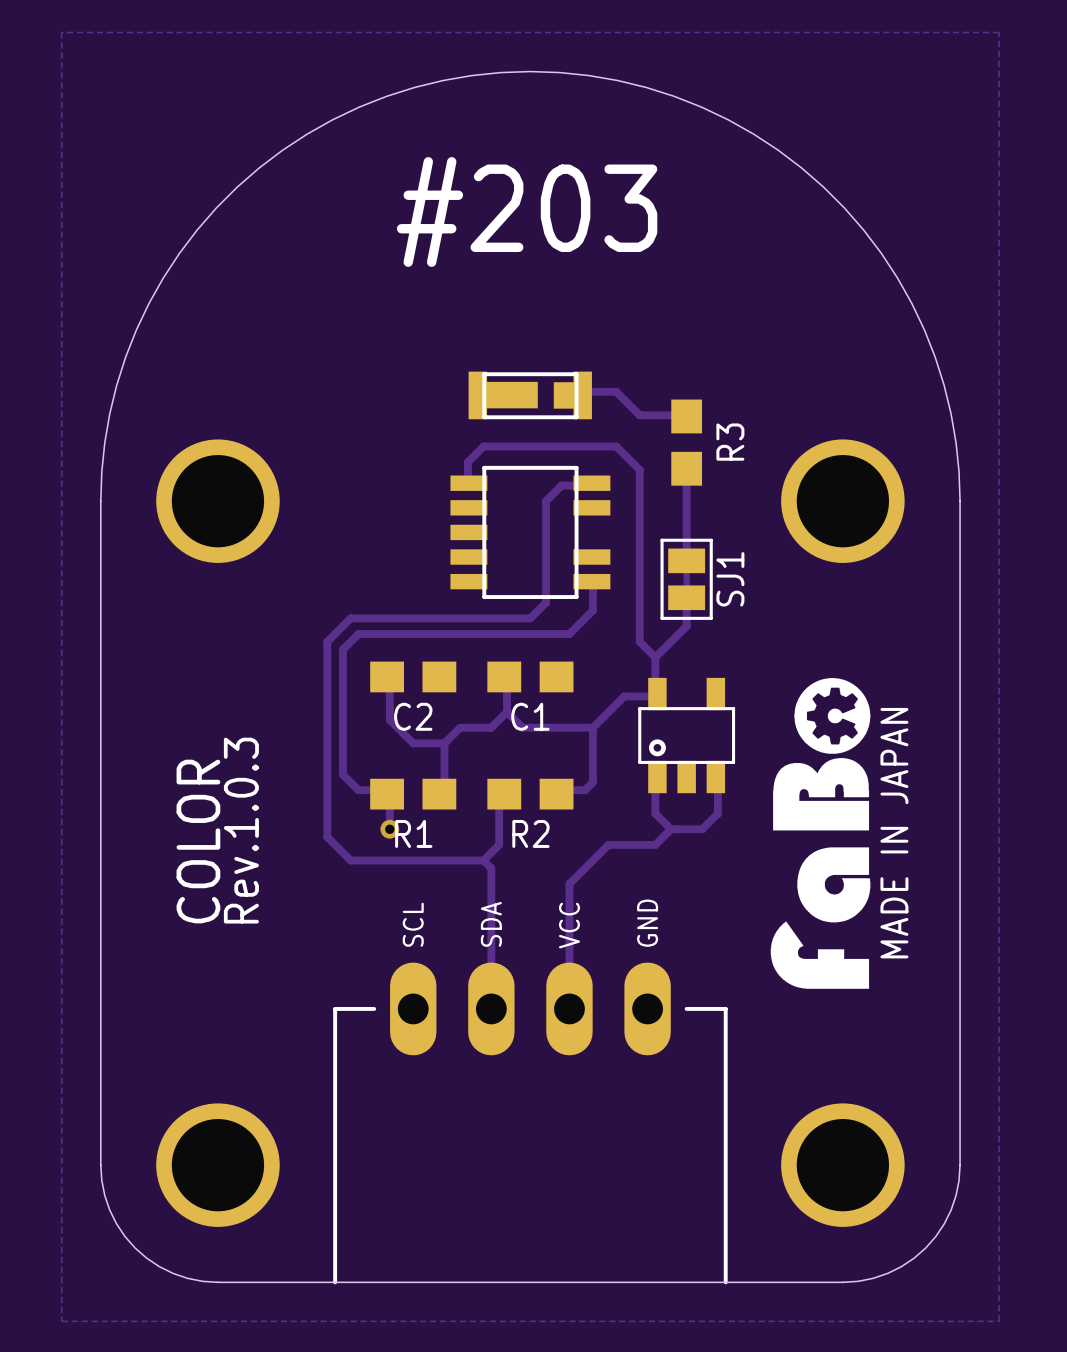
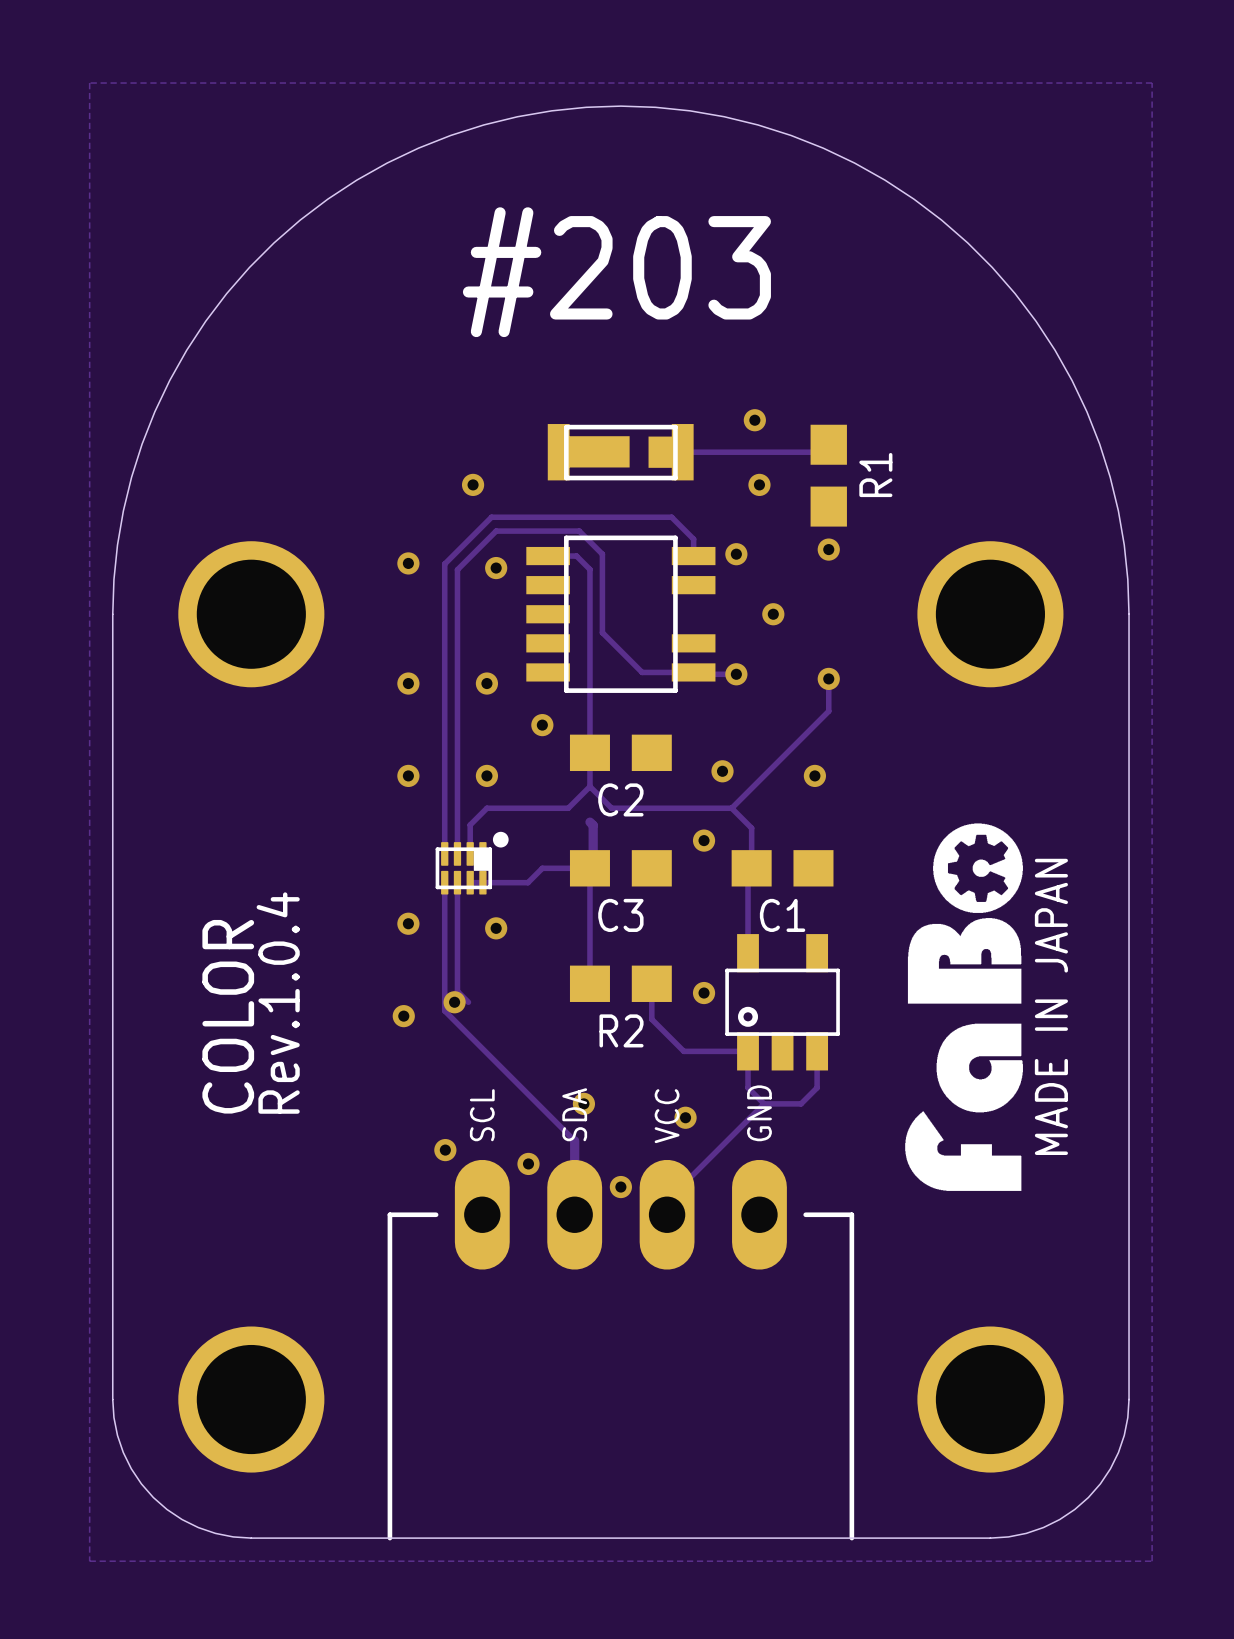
zone outline: (61, 32) (999, 32) (999, 1321) (61, 1321) (61, 32) -> (89, 83) (89, 1561) (1152, 1561) (1152, 83) (89, 83)
via: none -> (754, 420)
track: none -> (828, 444) (821, 452) (660, 452)
via: none -> (473, 484)
via: none -> (759, 484)
part position: (530, 395) -> (620, 452)
track: (563, 395) (582, 395) (582, 405) (569, 391) (616, 391) (639, 415) (686, 416) -> none
R3: (686, 442) -> none
via: none -> (828, 549)
via: none -> (736, 554)
track: none -> (548, 556) (576, 556) (589, 569) (589, 786)
track: none -> (693, 556) (693, 539) (671, 517) (491, 517) (444, 564) (444, 853)
via: none -> (408, 563)
via: none -> (496, 568)
track: (686, 468) (686, 626) (655, 657) -> none
track: (468, 483) (468, 486) (467, 462) (483, 446) (616, 446) (639, 469) (639, 641) (655, 657) -> none
track: (591, 483) (585, 485) (561, 485) (546, 501) (546, 602) (530, 618) (350, 618) (327, 641) (327, 837) (350, 860) (483, 860) -> none
via: none -> (773, 614)
part position: (530, 532) -> (620, 614)
track: none -> (736, 674) (642, 672) (602, 632) (602, 554) (579, 531) (496, 531) (457, 569) (457, 853)
via: none -> (736, 674)
track: none -> (828, 678) (828, 711) (731, 808)
via: none -> (828, 678)
via: none -> (408, 683)
via: none -> (486, 683)
SJ1: (686, 579) -> none
track: (591, 581) (592, 610) (569, 633) (358, 633) (342, 649) (342, 774) (358, 790) (374, 790) (378, 794) (387, 794) (387, 803) (389, 805) (389, 829) -> none
via: none -> (542, 725)
via: none -> (722, 771)
via: none -> (408, 775)
via: none -> (486, 775)
via: none -> (814, 775)
track: none -> (589, 786) (611, 808) (731, 808)
track: none -> (589, 786) (568, 808) (486, 808) (470, 824) (470, 853)
track: (655, 657) (655, 696) (624, 696) (592, 727) -> none
track: none -> (731, 808) (751, 828) (751, 868) (748, 871) (748, 953)
track: (387, 676) (387, 685) (389, 688) (389, 719) (413, 743) (444, 743) -> none
C2 position: (413, 676) -> (620, 752)
C1 position: (530, 676) -> (782, 868)
via: none -> (704, 840)
part: none -> (472, 863)
C3: none -> (620, 868)
track: (592, 727) (592, 782) (585, 790) (561, 790) (556, 794) -> none
track: (592, 727) (522, 727) (506, 712) (491, 727) (460, 727) (444, 743) -> none
track: none -> (457, 882) (457, 991) (468, 1002)
track: none -> (470, 882) (527, 882) (542, 868) (589, 868) (589, 983)
part position: (686, 735) -> (782, 1002)
track: (444, 743) (444, 789) (439, 794) -> none
via: none -> (408, 923)
via: none -> (496, 928)
track: (657, 777) (655, 779) (655, 813) (671, 829) -> none
track: (715, 777) (717, 813) (702, 829) (671, 829) -> none
R1 rotation: 0° (413, 794) -> 90° clockwise (828, 475)
R1 position: (413, 794) -> (828, 475)
track: (504, 794) (499, 798) (499, 844) (483, 860) -> none
R2 position: (530, 794) -> (620, 983)
track: none -> (651, 983) (651, 1019) (683, 1051) (748, 1051) (748, 1087) (764, 1103)
via: none -> (704, 993)
track: (671, 829) (655, 844) (608, 844) (569, 883) (569, 997) -> (764, 1103) (667, 1200)
text: Rev.1.0.3 (241, 830) -> Rev.1.0.4 (278, 1003)
via: none -> (403, 1016)
track: (483, 860) (491, 868) (491, 946) -> (444, 882) (444, 1010) (574, 1140)
track: none -> (817, 1051) (817, 1087) (801, 1103) (764, 1103)
via: none -> (583, 1103)
via: none -> (685, 1117)
via: none -> (445, 1150)
via: none -> (528, 1163)
via: none -> (620, 1187)

